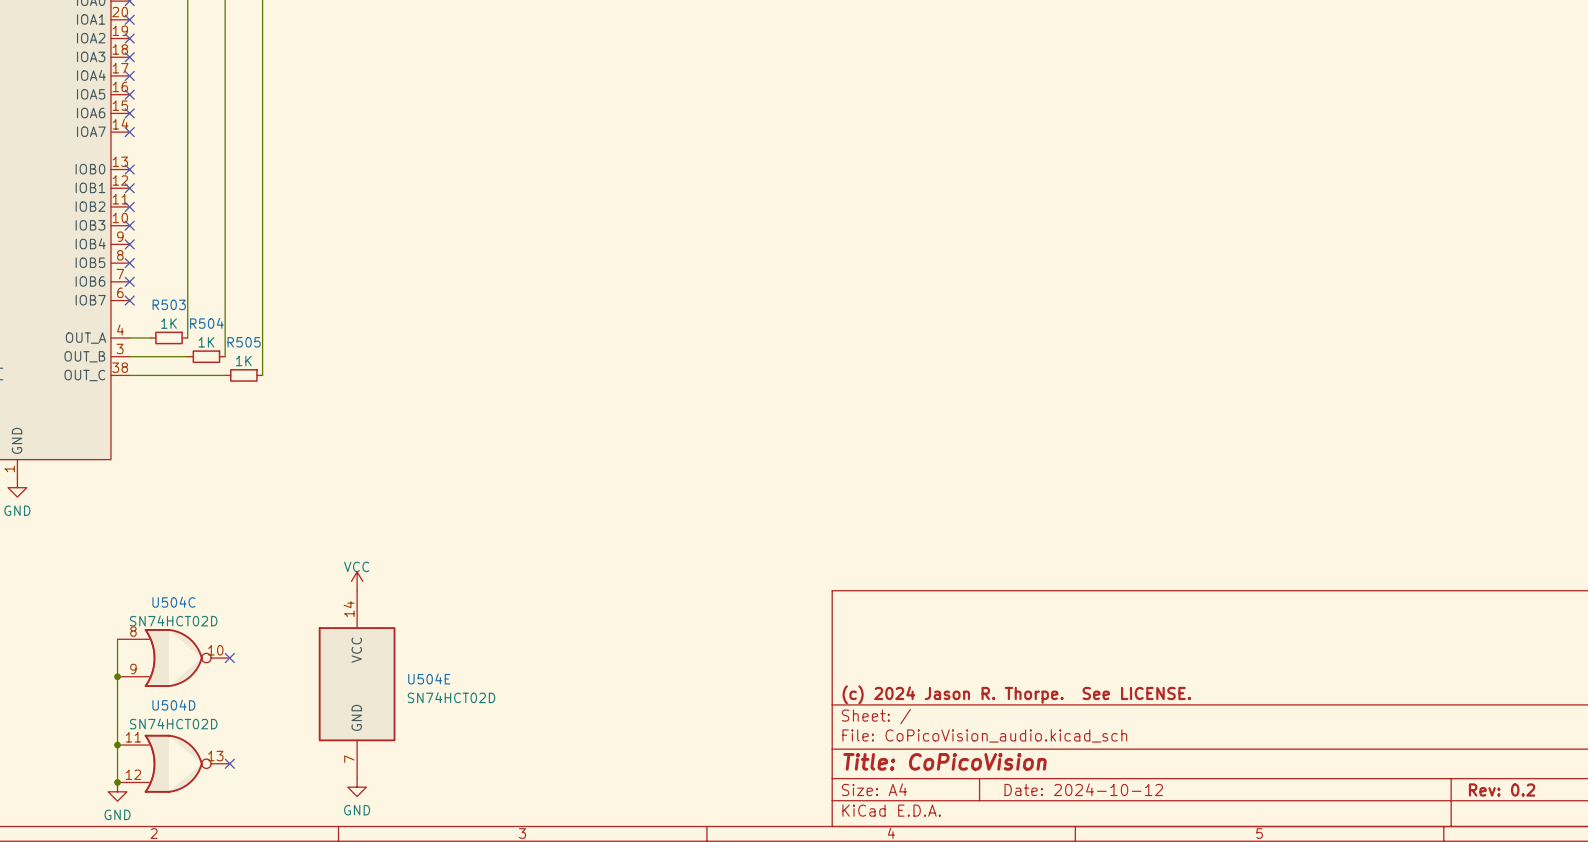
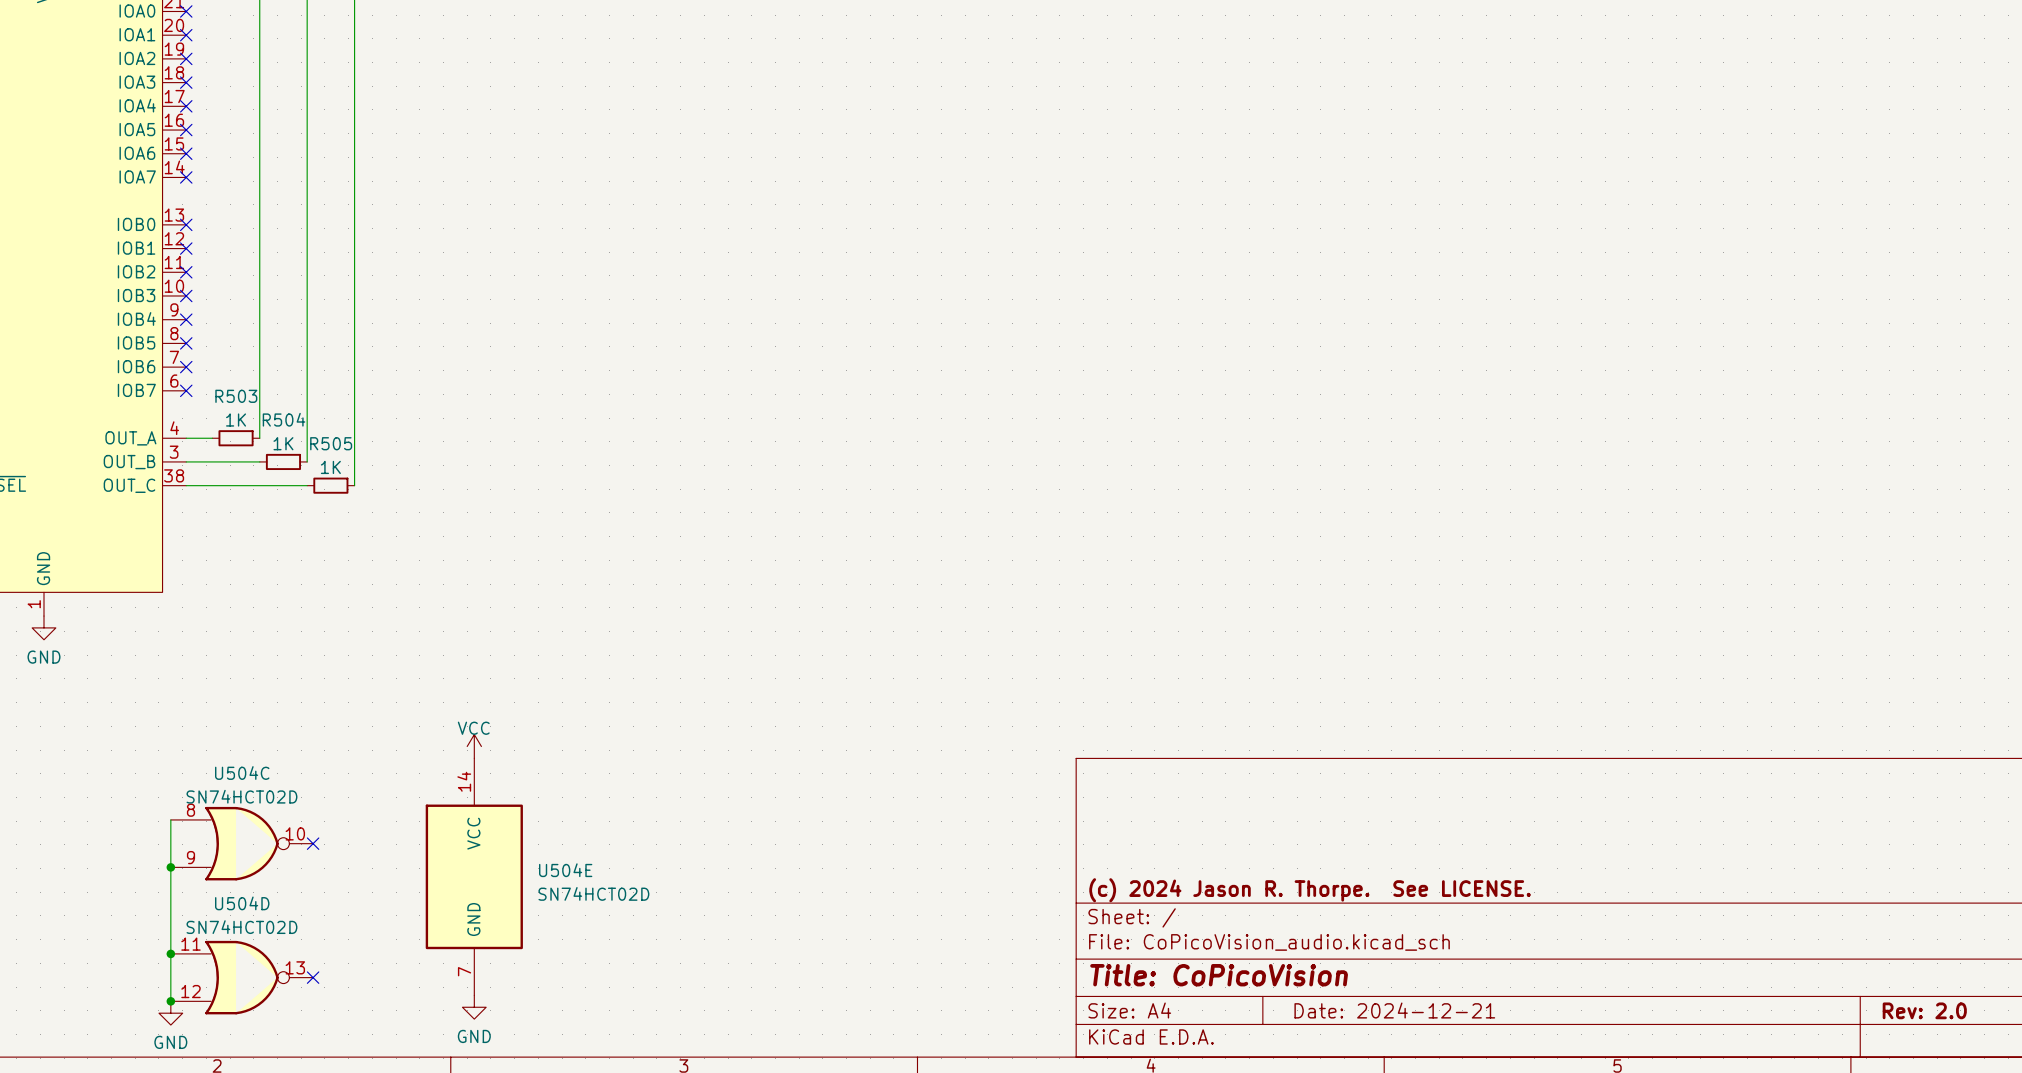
title block: Date: 2024-10-12 (1083, 789) -> Date: 2024-12-21 (1394, 1010)
title block: Rev: 0.2 (1502, 789) -> Rev: 2.0 (1924, 1010)

